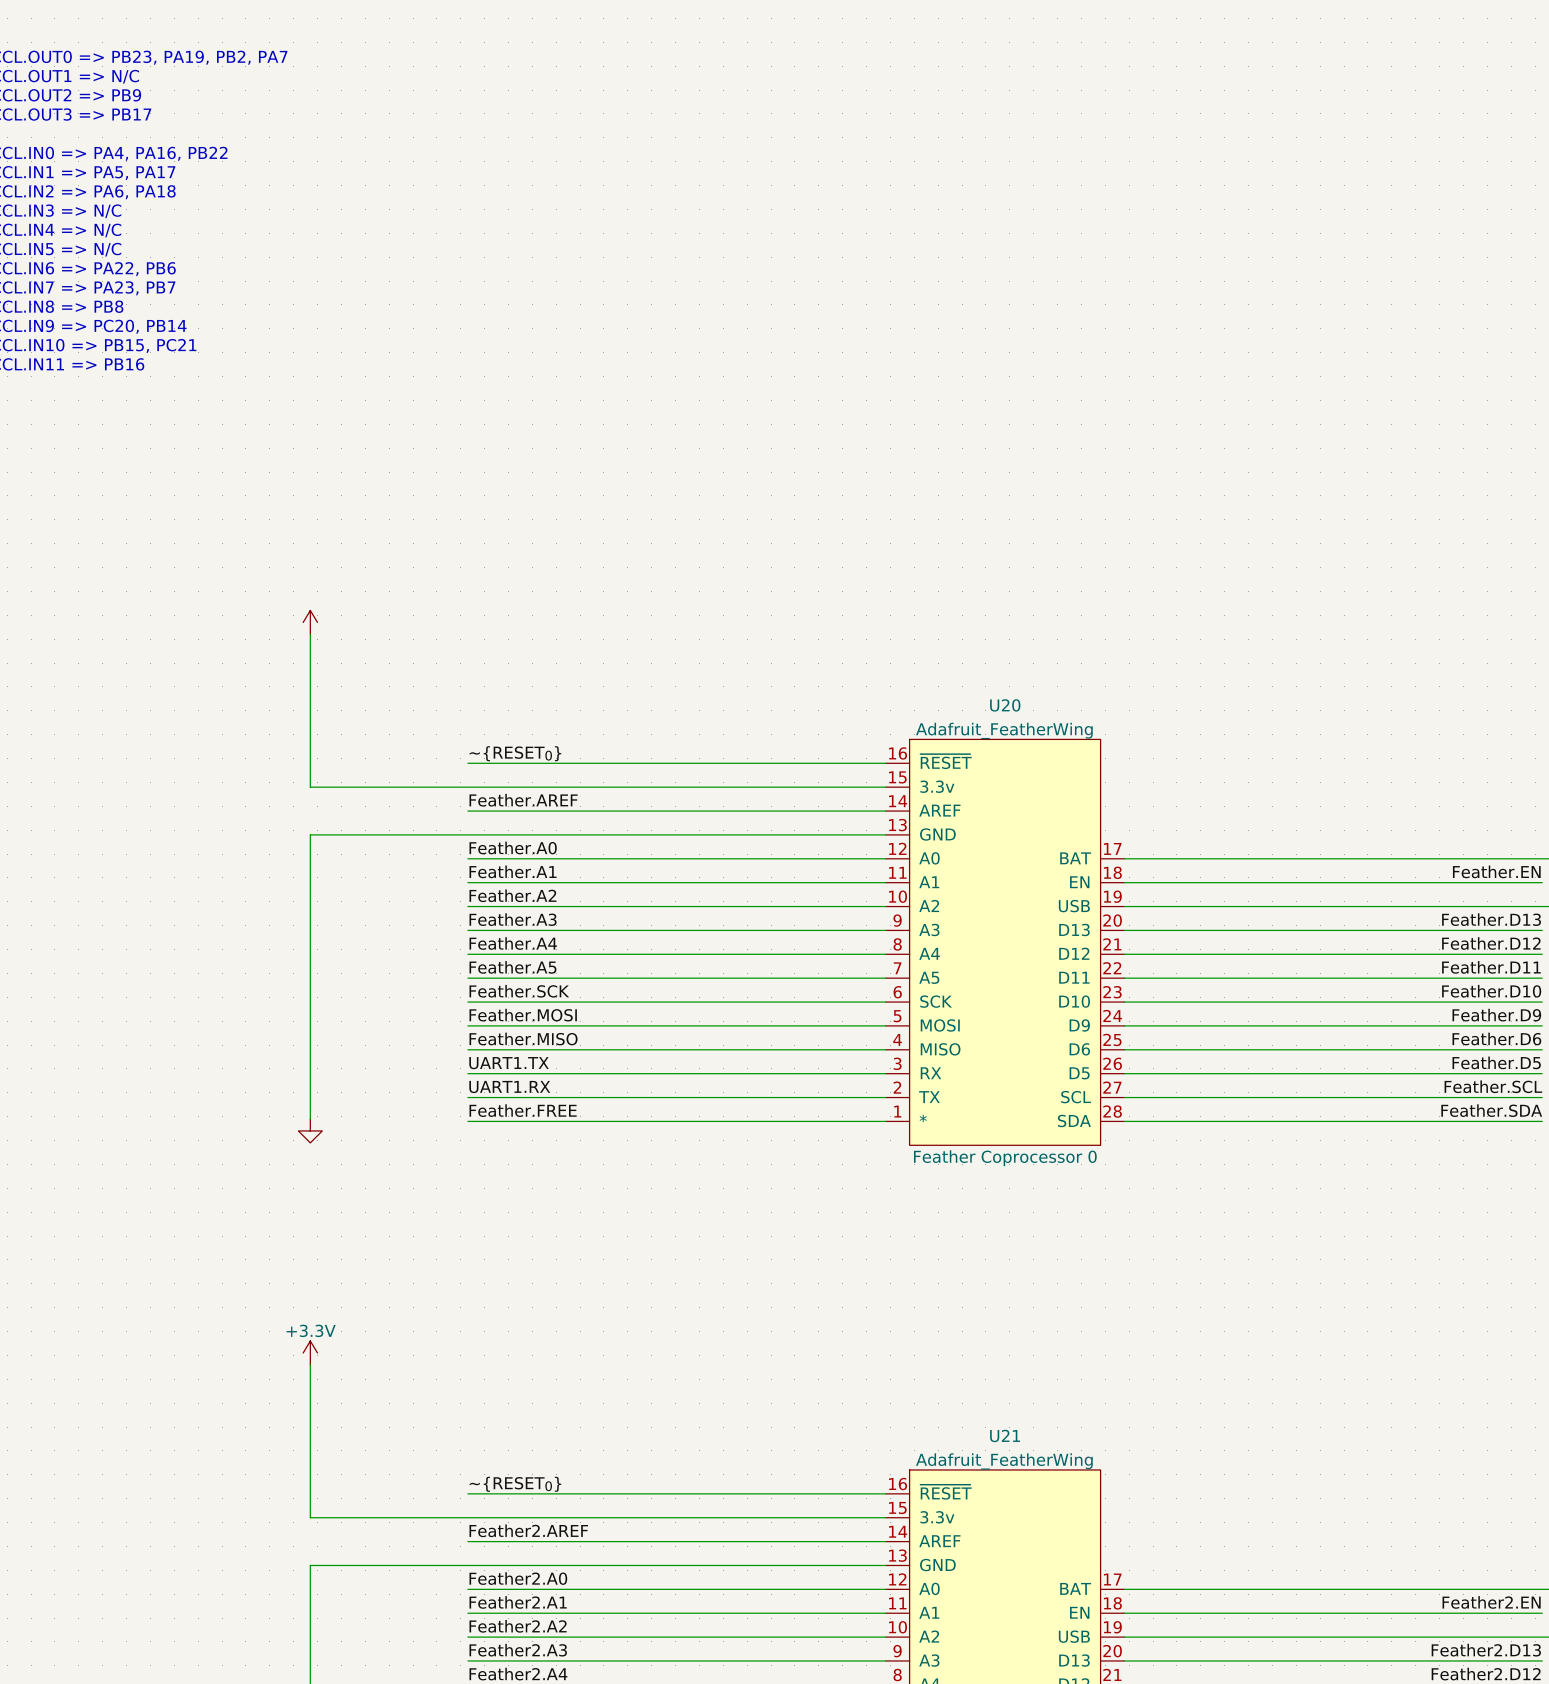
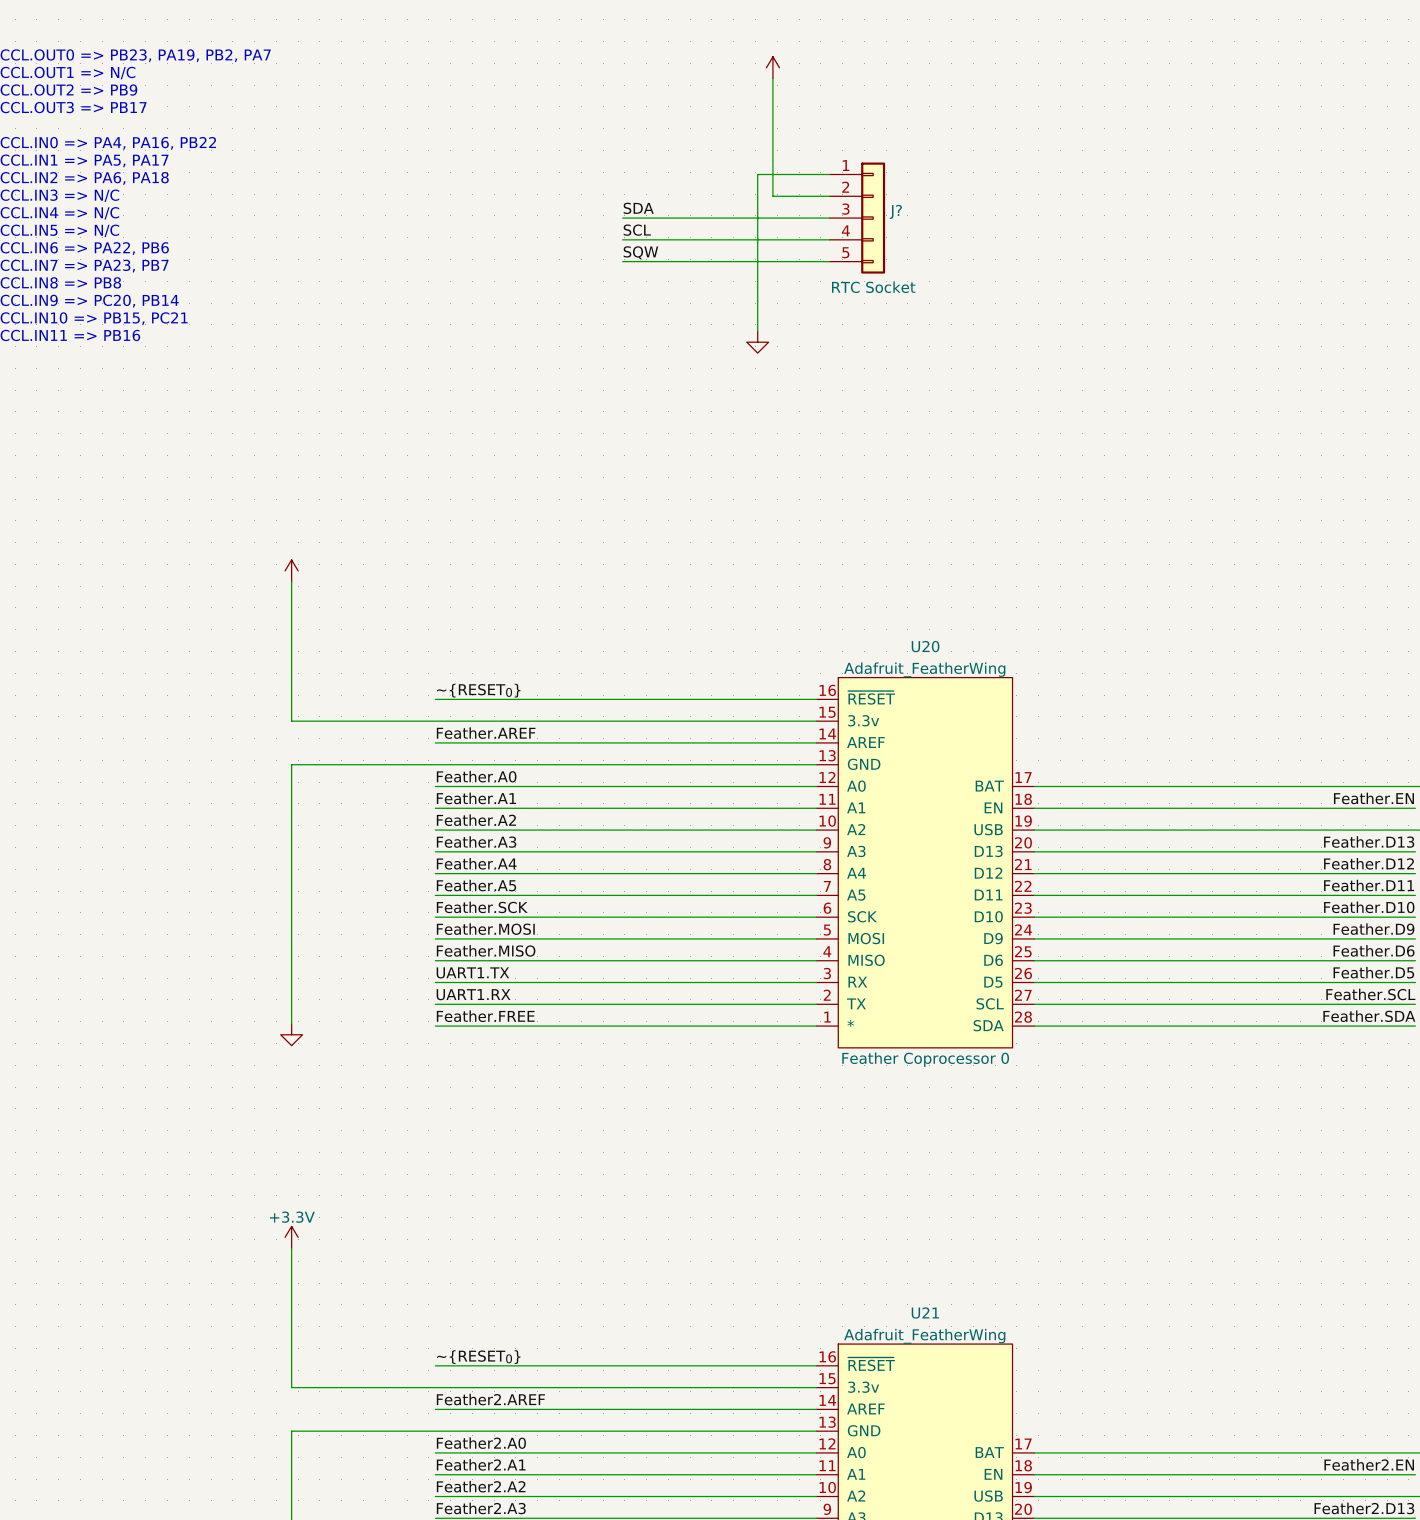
power symbol: none -> (772, 67)
wire: none -> (772, 78) (772, 196) (829, 196)
wire: none -> (829, 174) (757, 174) (757, 331)
label: none -> SDA (638, 208)
wire: none -> (622, 218) (829, 218)
J?: none -> (857, 218)
label: none -> SCL (637, 230)
wire: none -> (622, 239) (829, 239)
label: none -> SQW (640, 252)
wire: none -> (622, 261) (829, 261)
power symbol: none -> (757, 342)

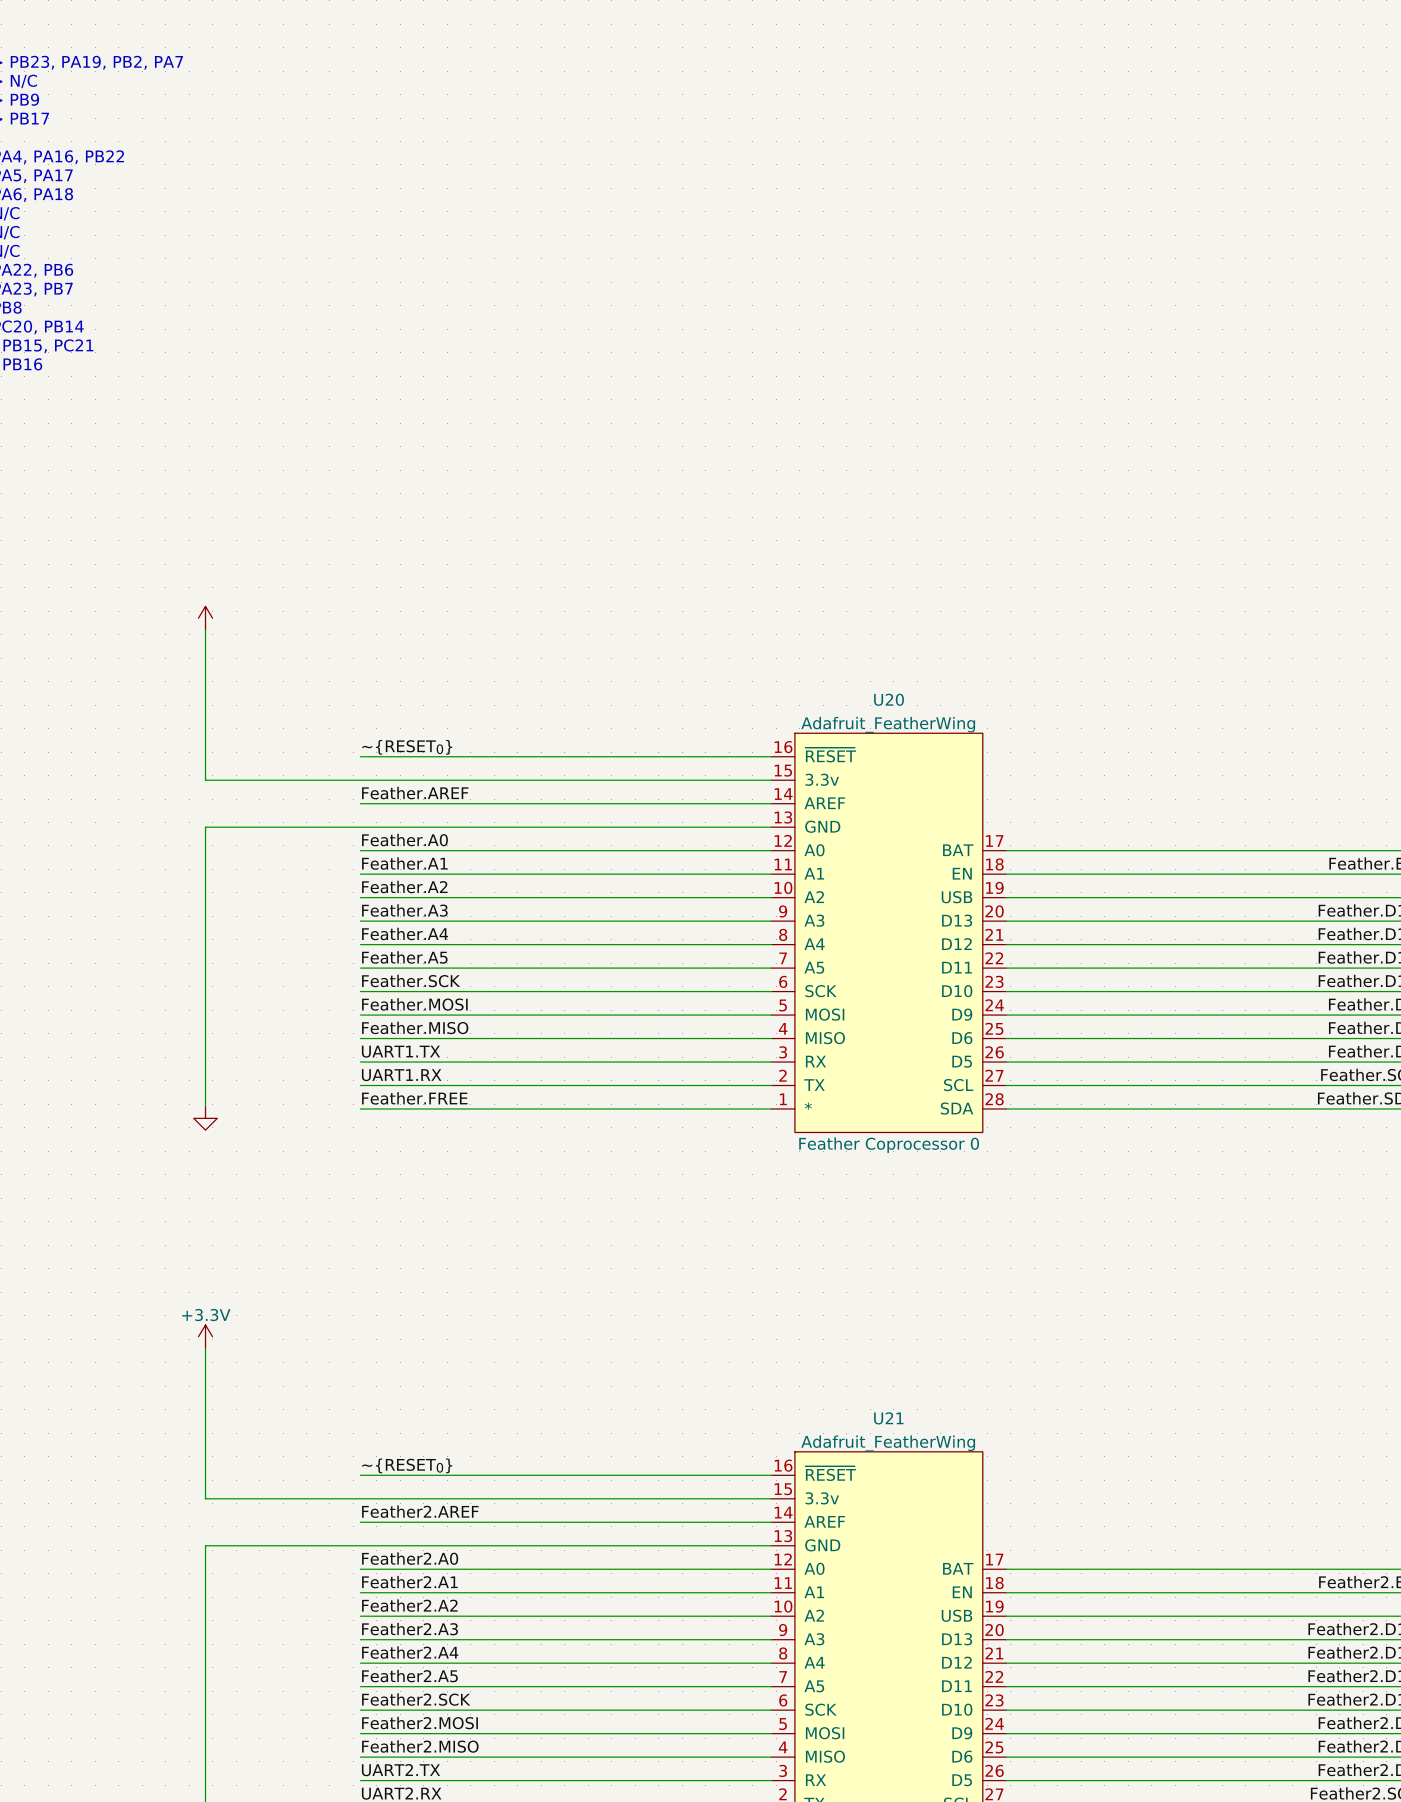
power symbol: (772, 67) -> none
wire: (772, 78) (772, 196) (829, 196) -> none
wire: (829, 174) (757, 174) (757, 331) -> none
label: SDA (638, 208) -> none
wire: (622, 218) (829, 218) -> none
J?: (857, 218) -> none
label: SCL (637, 230) -> none
wire: (622, 239) (829, 239) -> none
label: SQW (640, 252) -> none
wire: (622, 261) (829, 261) -> none
power symbol: (757, 342) -> none

